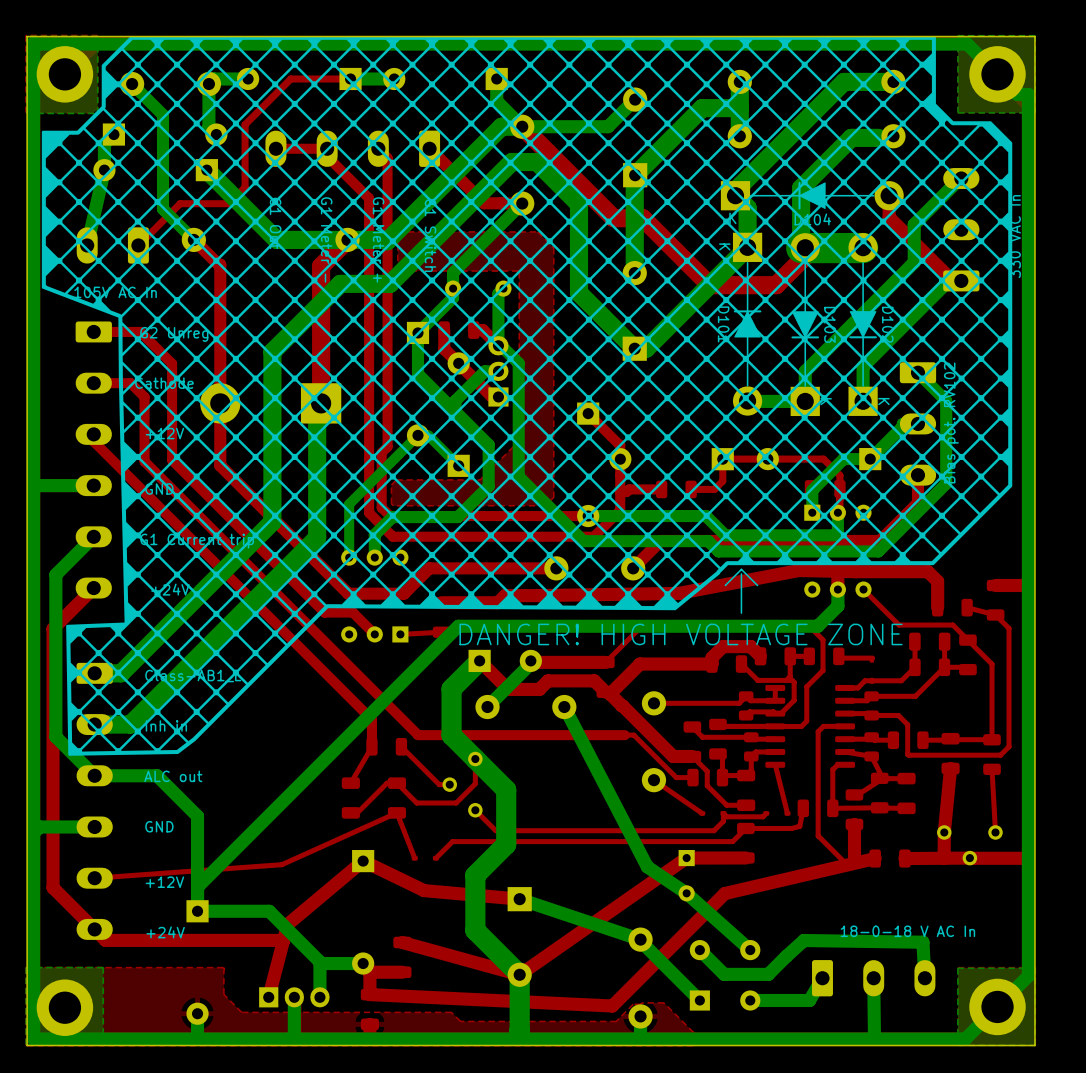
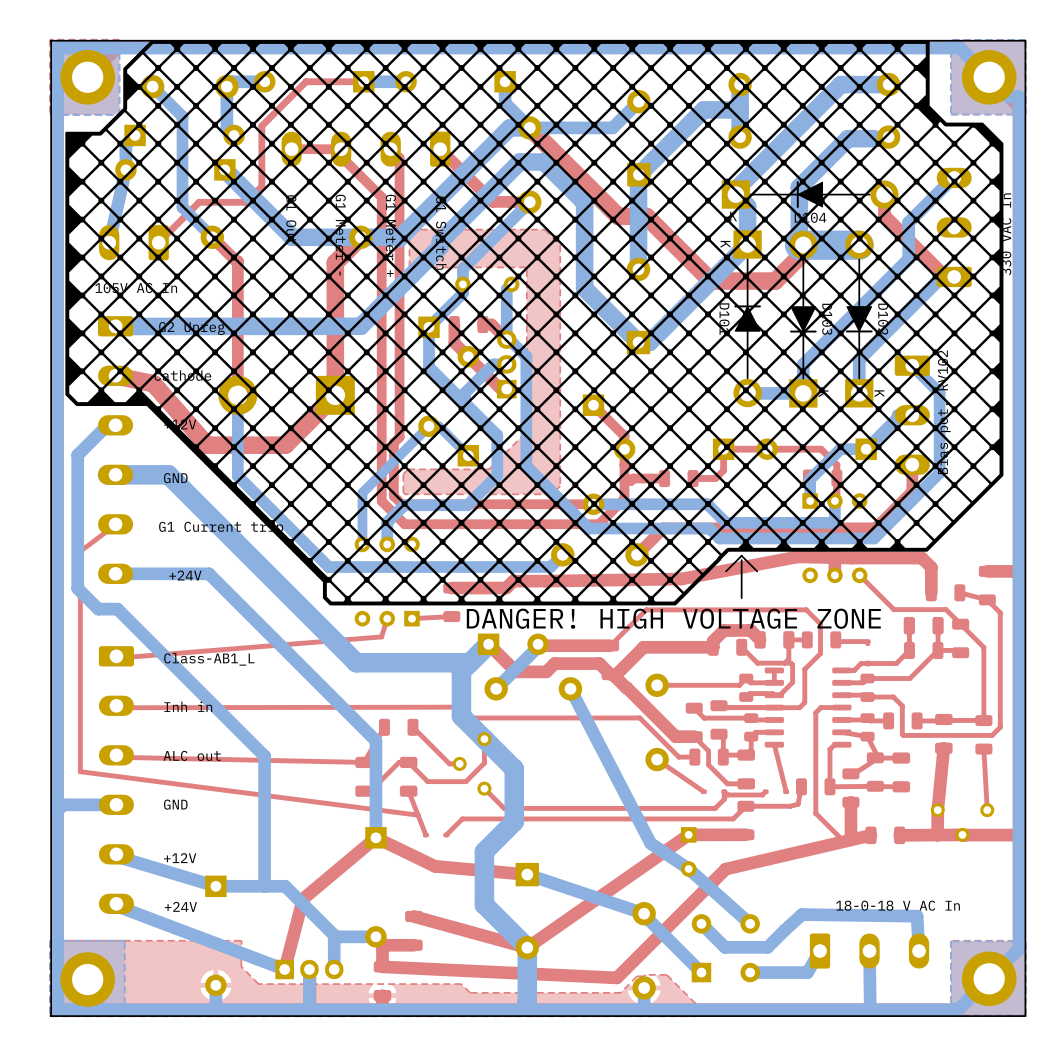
drawing: [41, 36, 1013, 756] -> none
drawing: none -> [65, 40, 1004, 606]
bottom track: (429, 244) (390, 283) (340, 283) (272, 351) (272, 522) (121, 673) (94, 673) -> (440, 241) (440, 246) (360, 326) (116, 326)
top track: (93, 331) (140, 331) (172, 363) (172, 460) (324, 612) (352, 612) (374, 634) -> (116, 658) (381, 636) (387, 618)
top track: (93, 383) (130, 383) (144, 397) (144, 461) (418, 735) (633, 735) (676, 777) -> (116, 707) (455, 707) (465, 717) (639, 717) (678, 757)
top track: none -> (116, 375) (153, 383) (207, 445) (285, 445) (335, 395)
top track: (220, 403) (220, 465) (348, 593) (403, 593) (429, 568) (556, 568) -> none
bottom track: none -> (237, 395) (237, 476) (328, 567) (550, 567) (562, 554)
bottom track: (317, 407) (317, 537) (130, 724) (94, 724) -> none
bottom track: none -> (107, 425) (77, 455) (77, 588) (98, 609) (117, 609) (264, 756) (264, 886)
top track: (93, 434) (93, 441) (371, 719) (371, 746) -> none
bottom track: (85, 485) (33, 487) -> none
bottom track: none -> (115, 474) (168, 474) (356, 662) (470, 662)
bottom track: (93, 536) (55, 574) (55, 736) (94, 775) (157, 775) (197, 816) (197, 911) -> (116, 856) (215, 886)
top track: none -> (116, 524) (80, 551) (80, 771) (418, 815)
bottom track: none -> (107, 573) (209, 573) (375, 740) (375, 837)
top track: (93, 588) (53, 628) (53, 887) (105, 940) (283, 940) -> none
bottom track: (837, 589) (837, 606) (817, 626) (458, 626) (197, 887) -> none
top track: none -> (116, 757) (364, 762)
top track: (396, 812) (281, 864) (94, 878) -> none
bottom track: none -> (116, 905) (284, 969)

